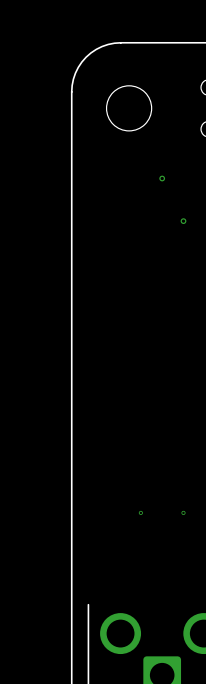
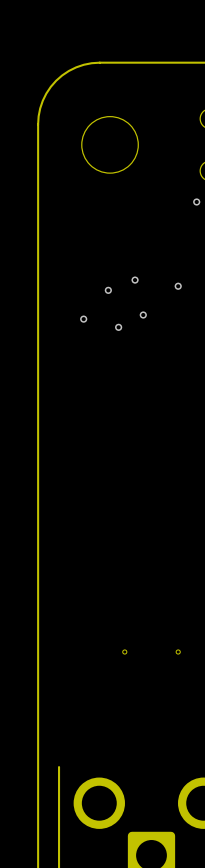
via: none -> (196, 202)
via: (162, 178) -> none
via: none -> (135, 280)
via: none -> (108, 290)
via: none -> (143, 315)
via: none -> (83, 319)
via: none -> (118, 327)

